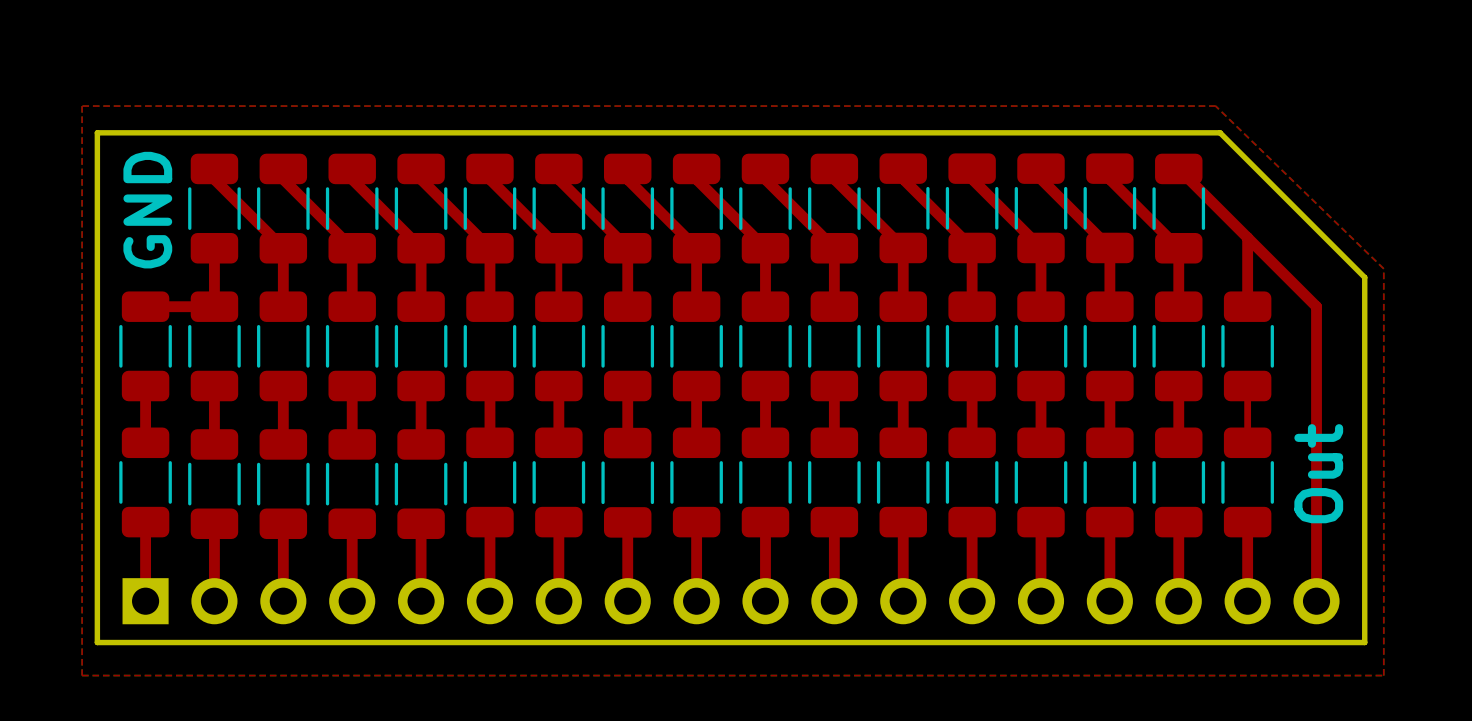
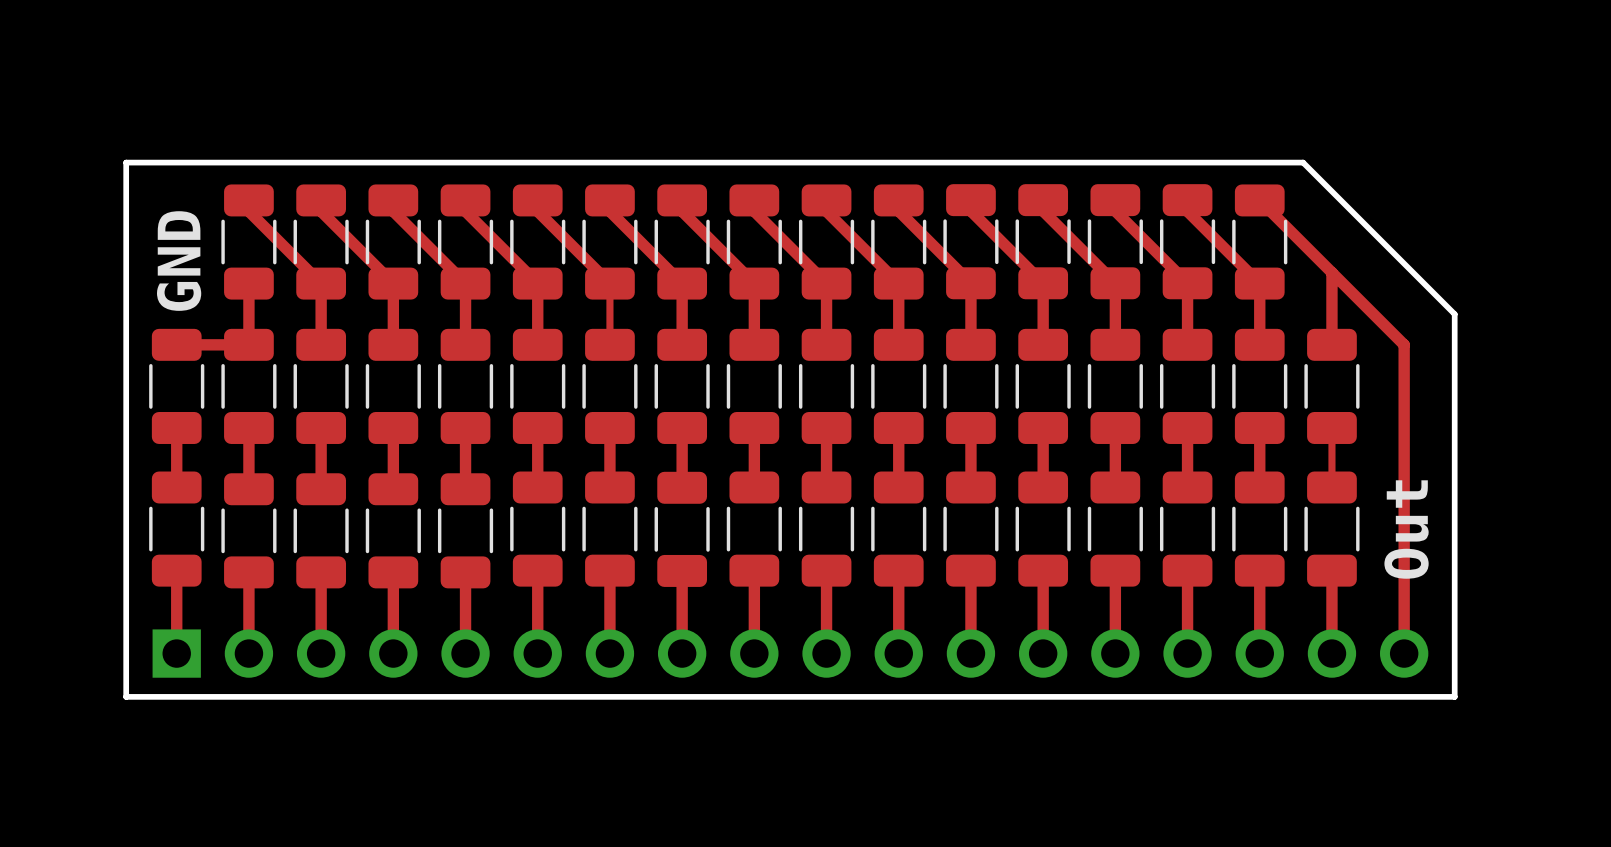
top zone outline: (82, 106) (82, 675) (1383, 675) (1383, 268) (1215, 106) (82, 106) -> none

